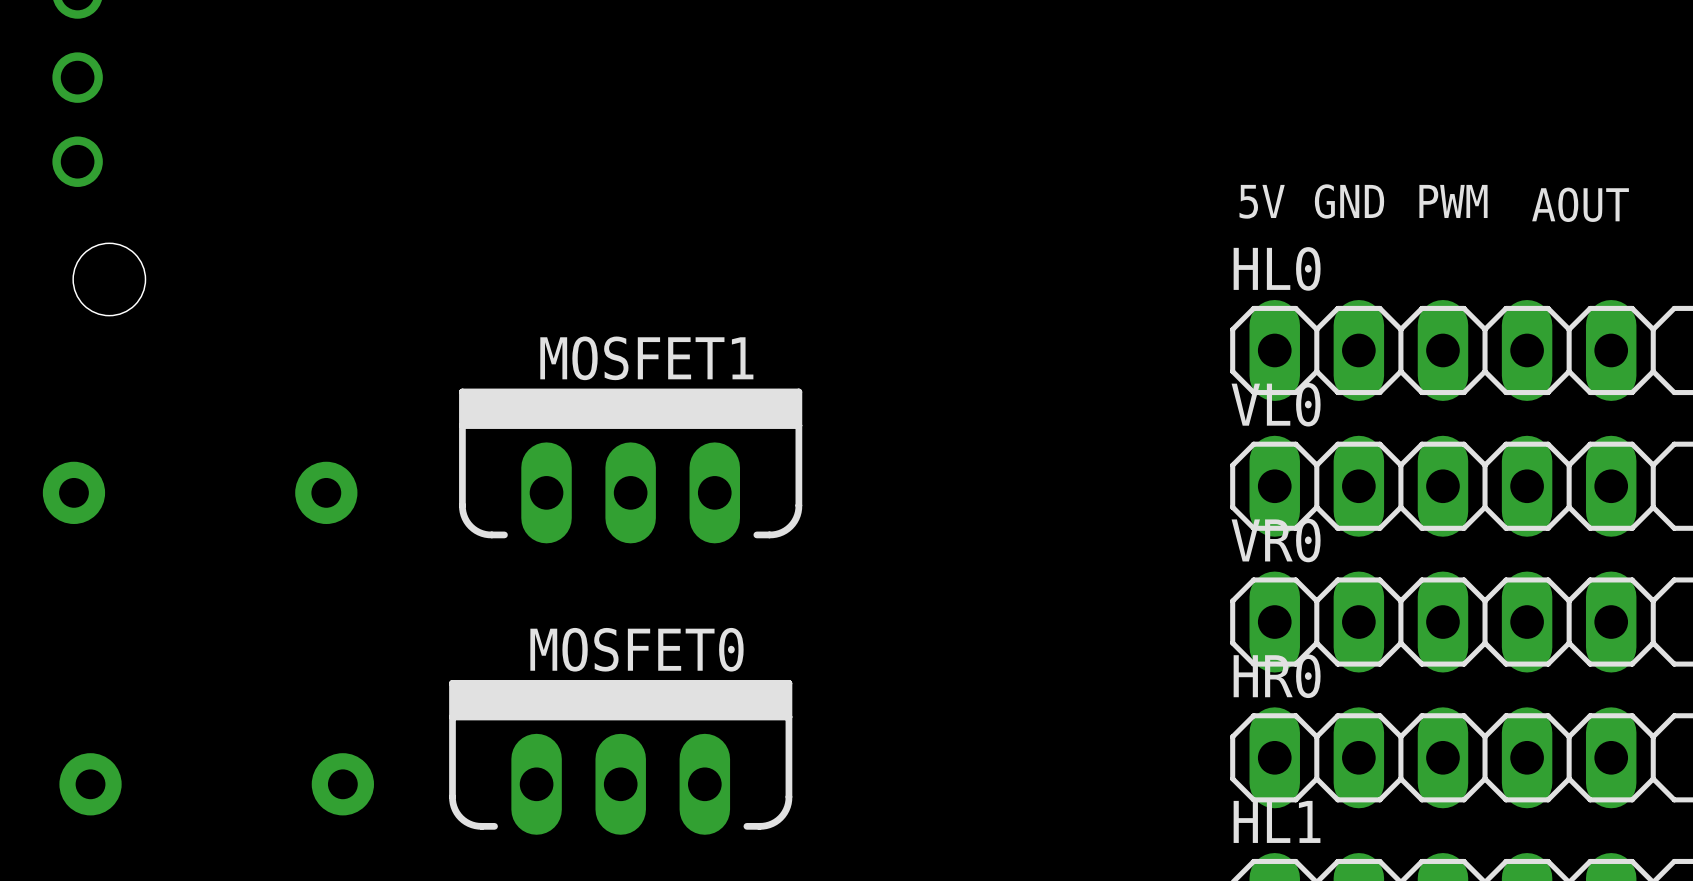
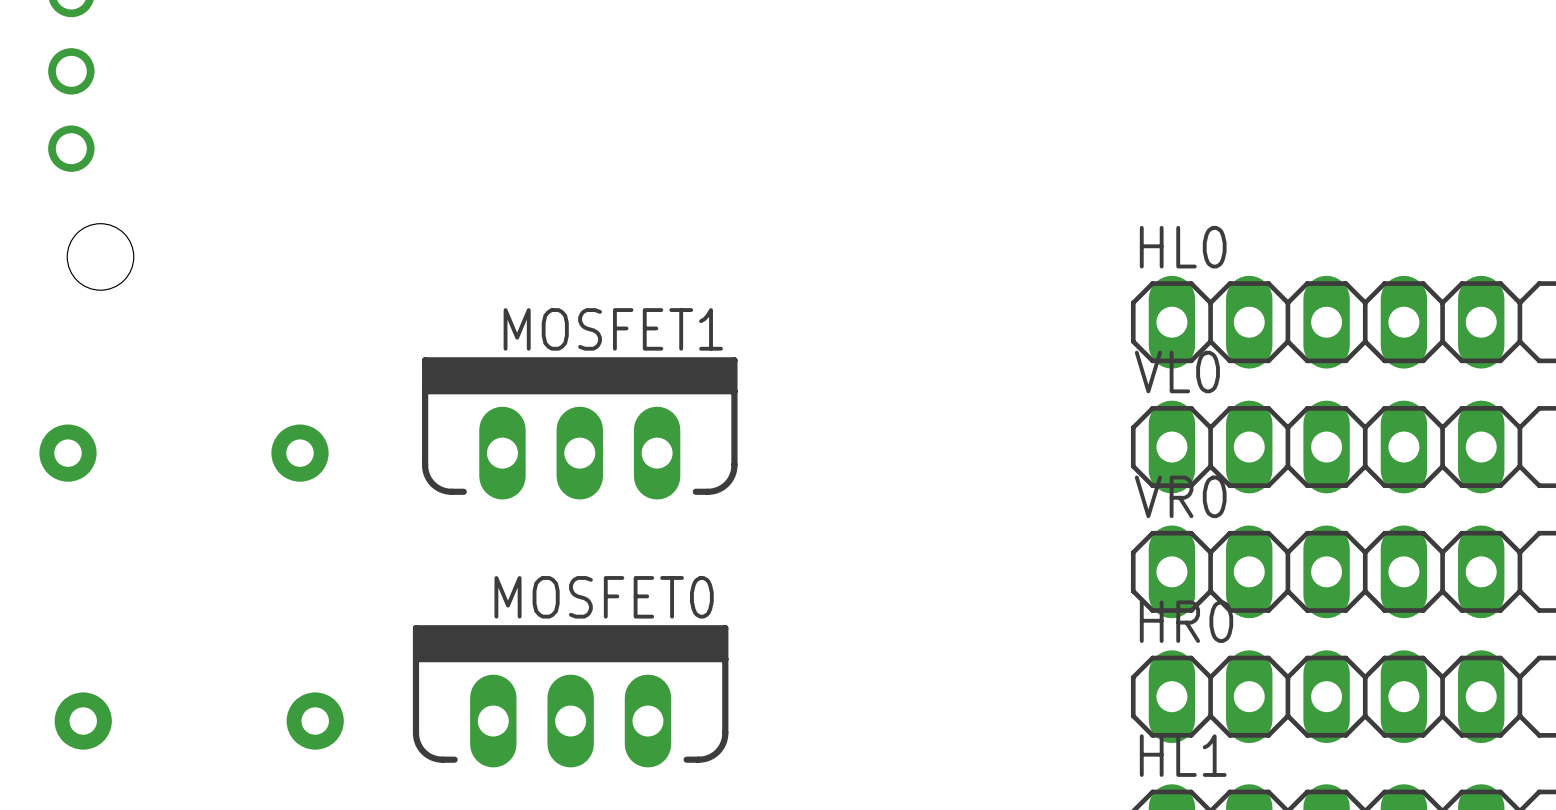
text: 5V (1262, 201) -> none
text: GND (1349, 201) -> none
text: PWM (1453, 201) -> none
text: AOUT (1580, 204) -> none

